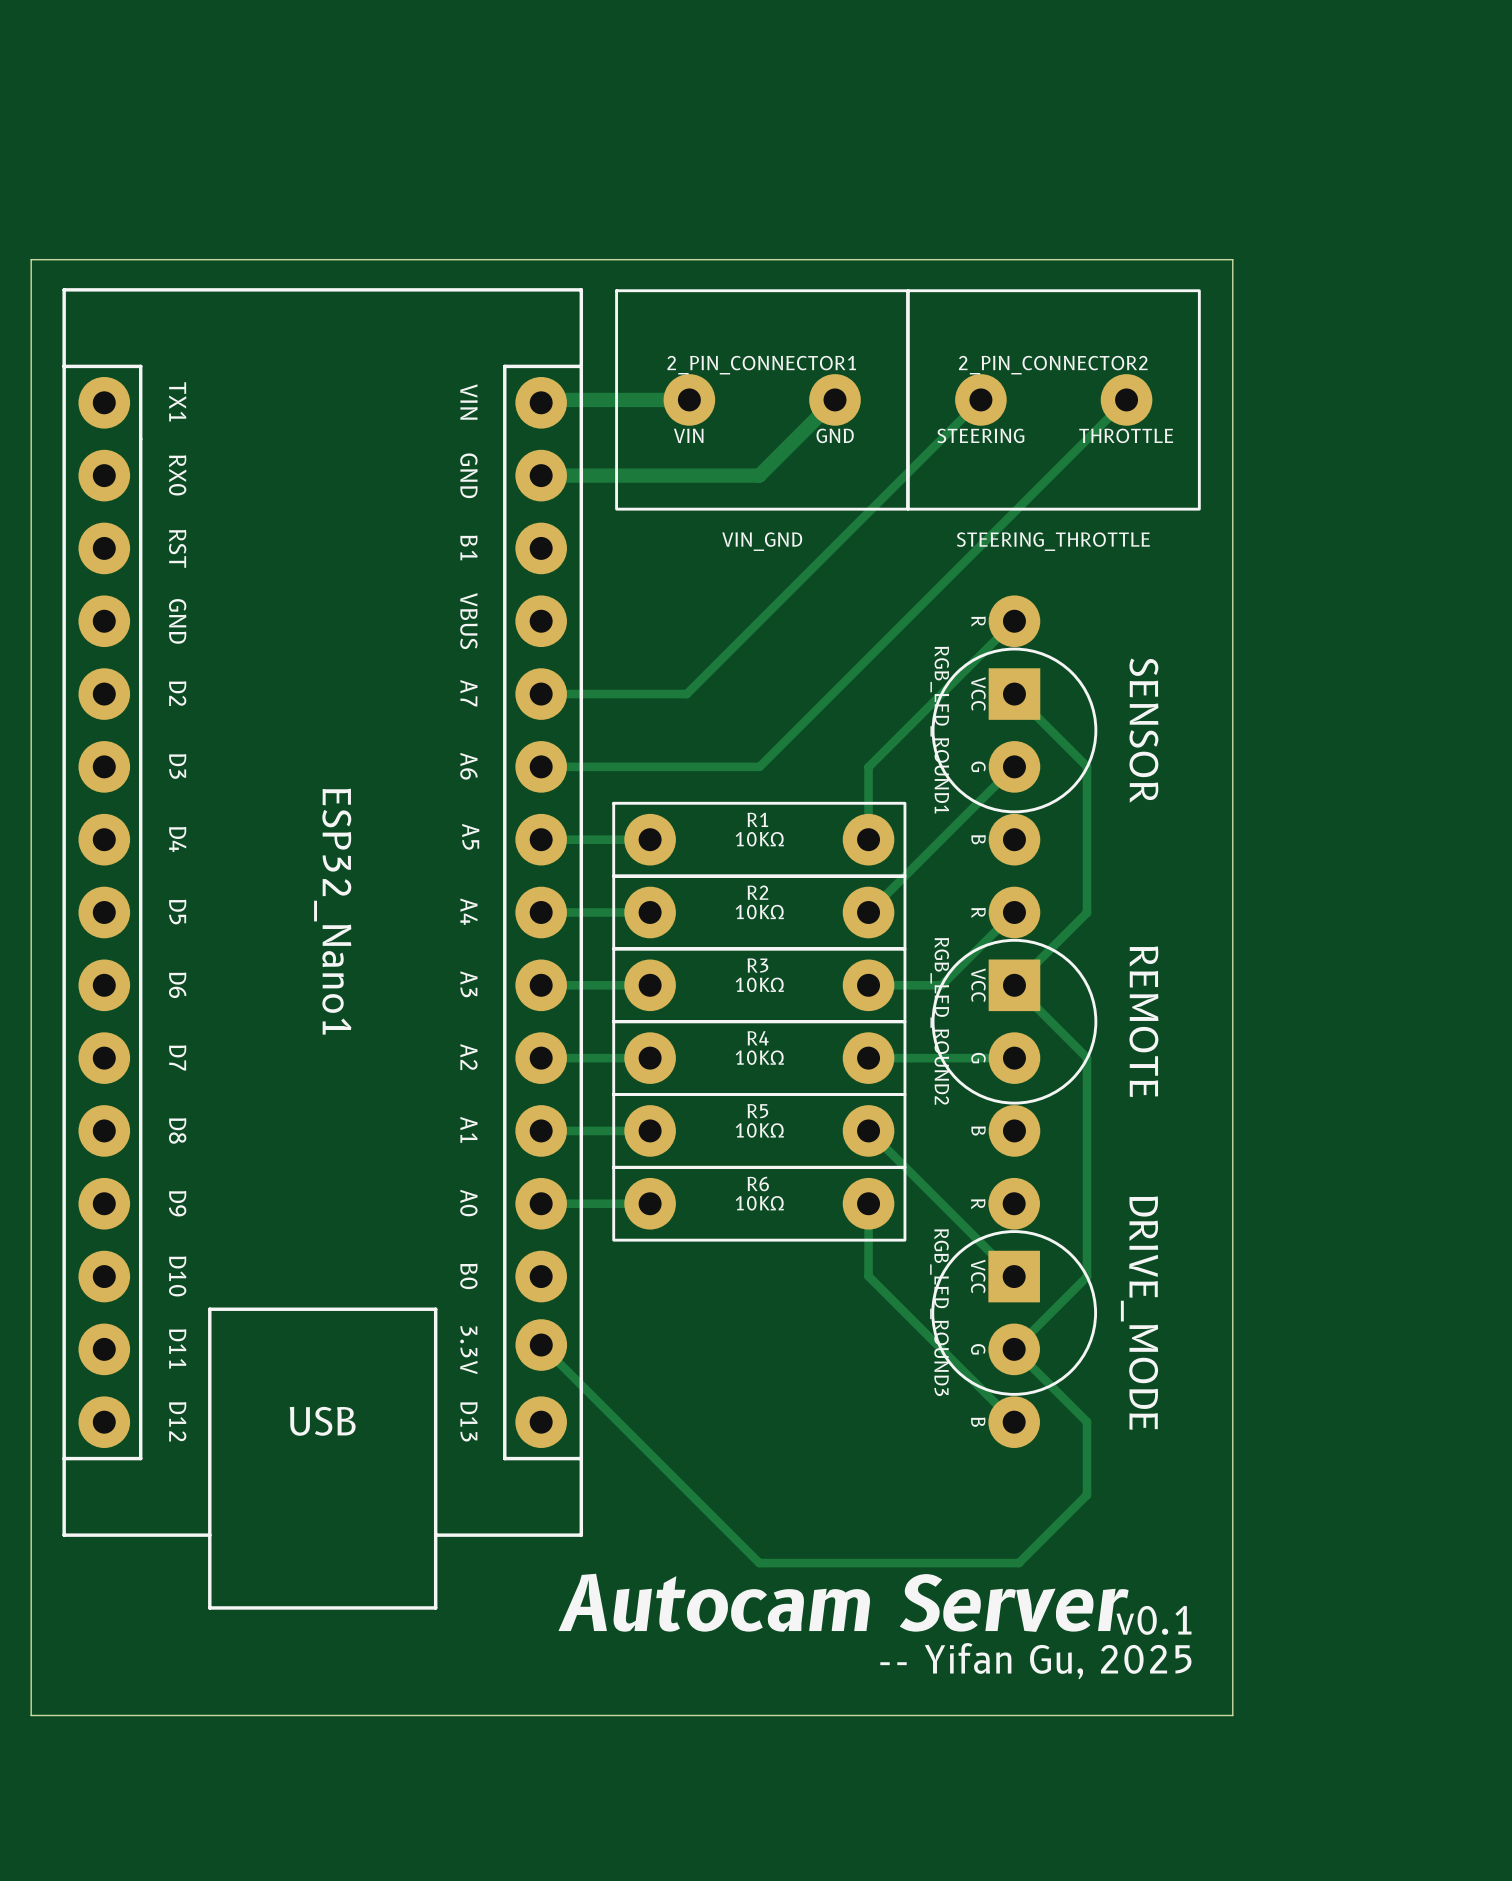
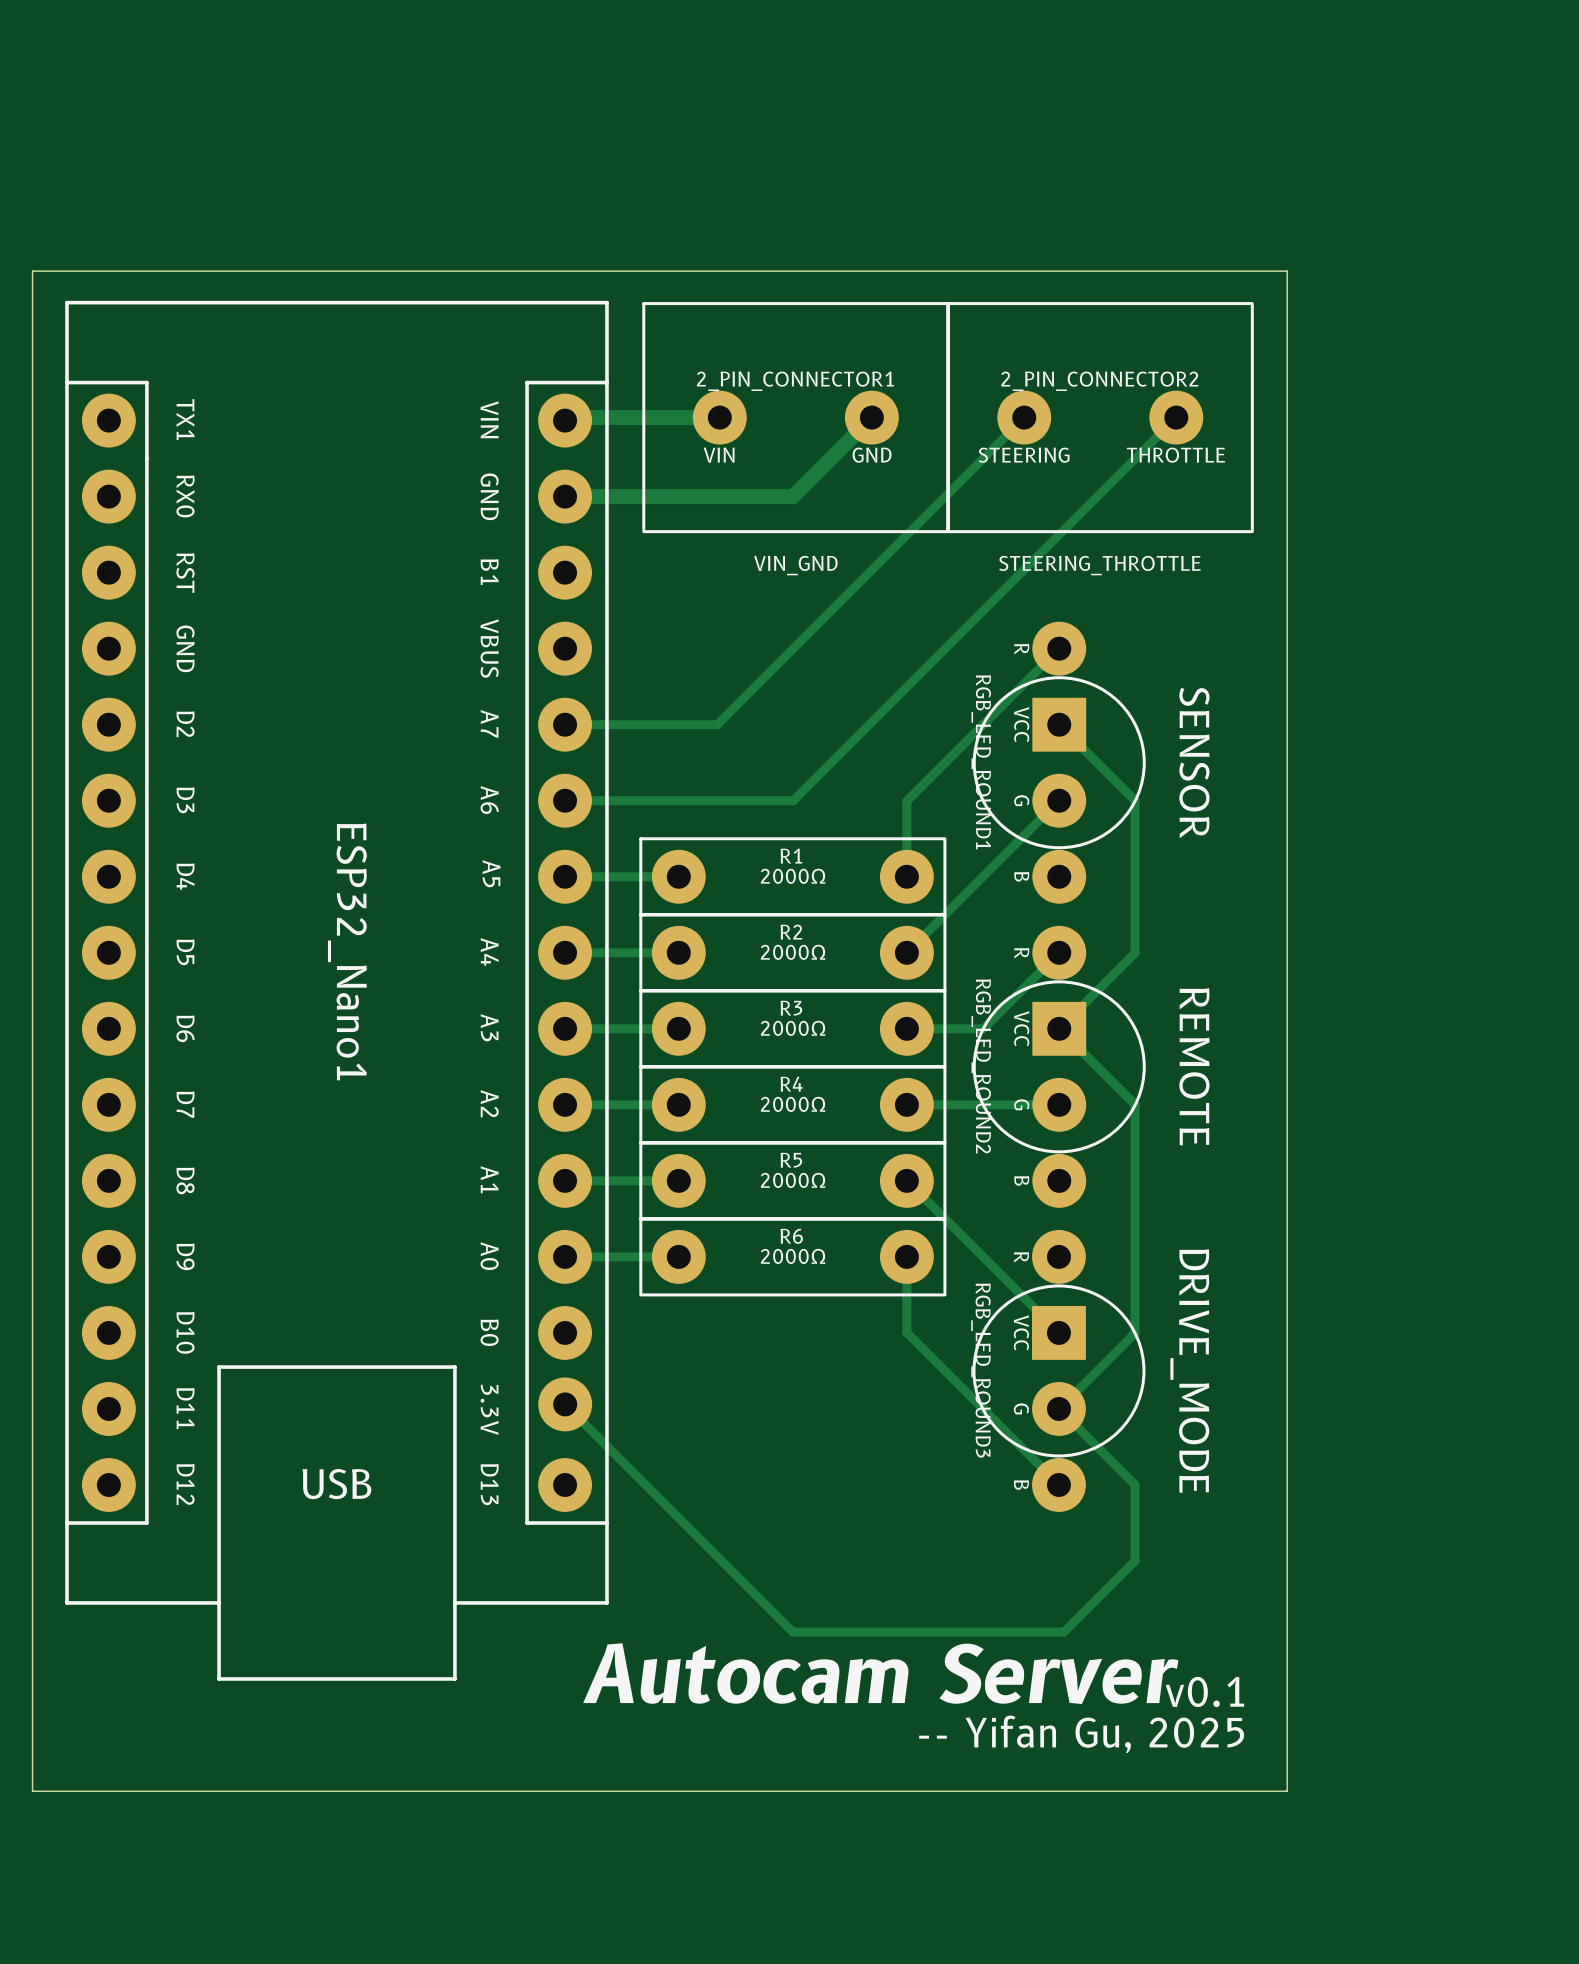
R1 value: 10KΩ (759, 839) -> 2000Ω (793, 876)
R2 value: 10KΩ (759, 912) -> 2000Ω (793, 952)
R3 value: 10KΩ (759, 984) -> 2000Ω (793, 1028)
R4 value: 10KΩ (759, 1057) -> 2000Ω (793, 1104)
R5 value: 10KΩ (759, 1130) -> 2000Ω (793, 1180)
R6 value: 10KΩ (759, 1203) -> 2000Ω (793, 1256)

